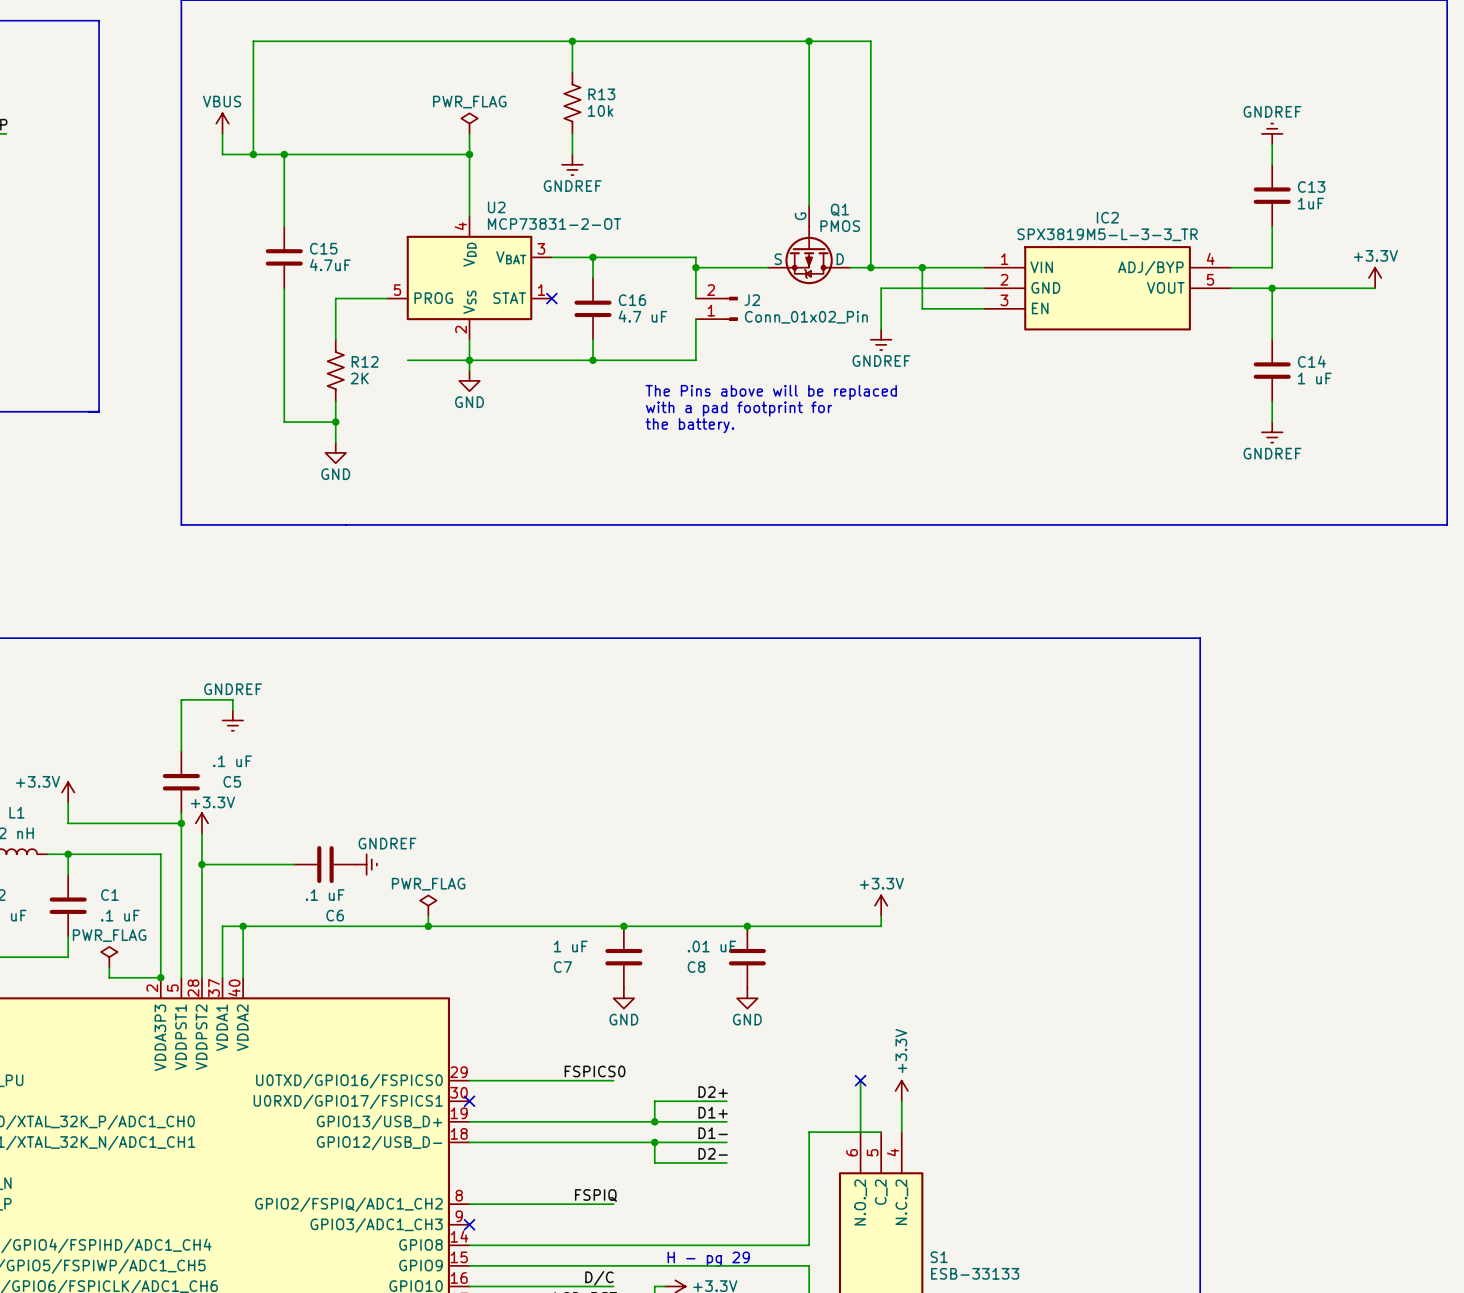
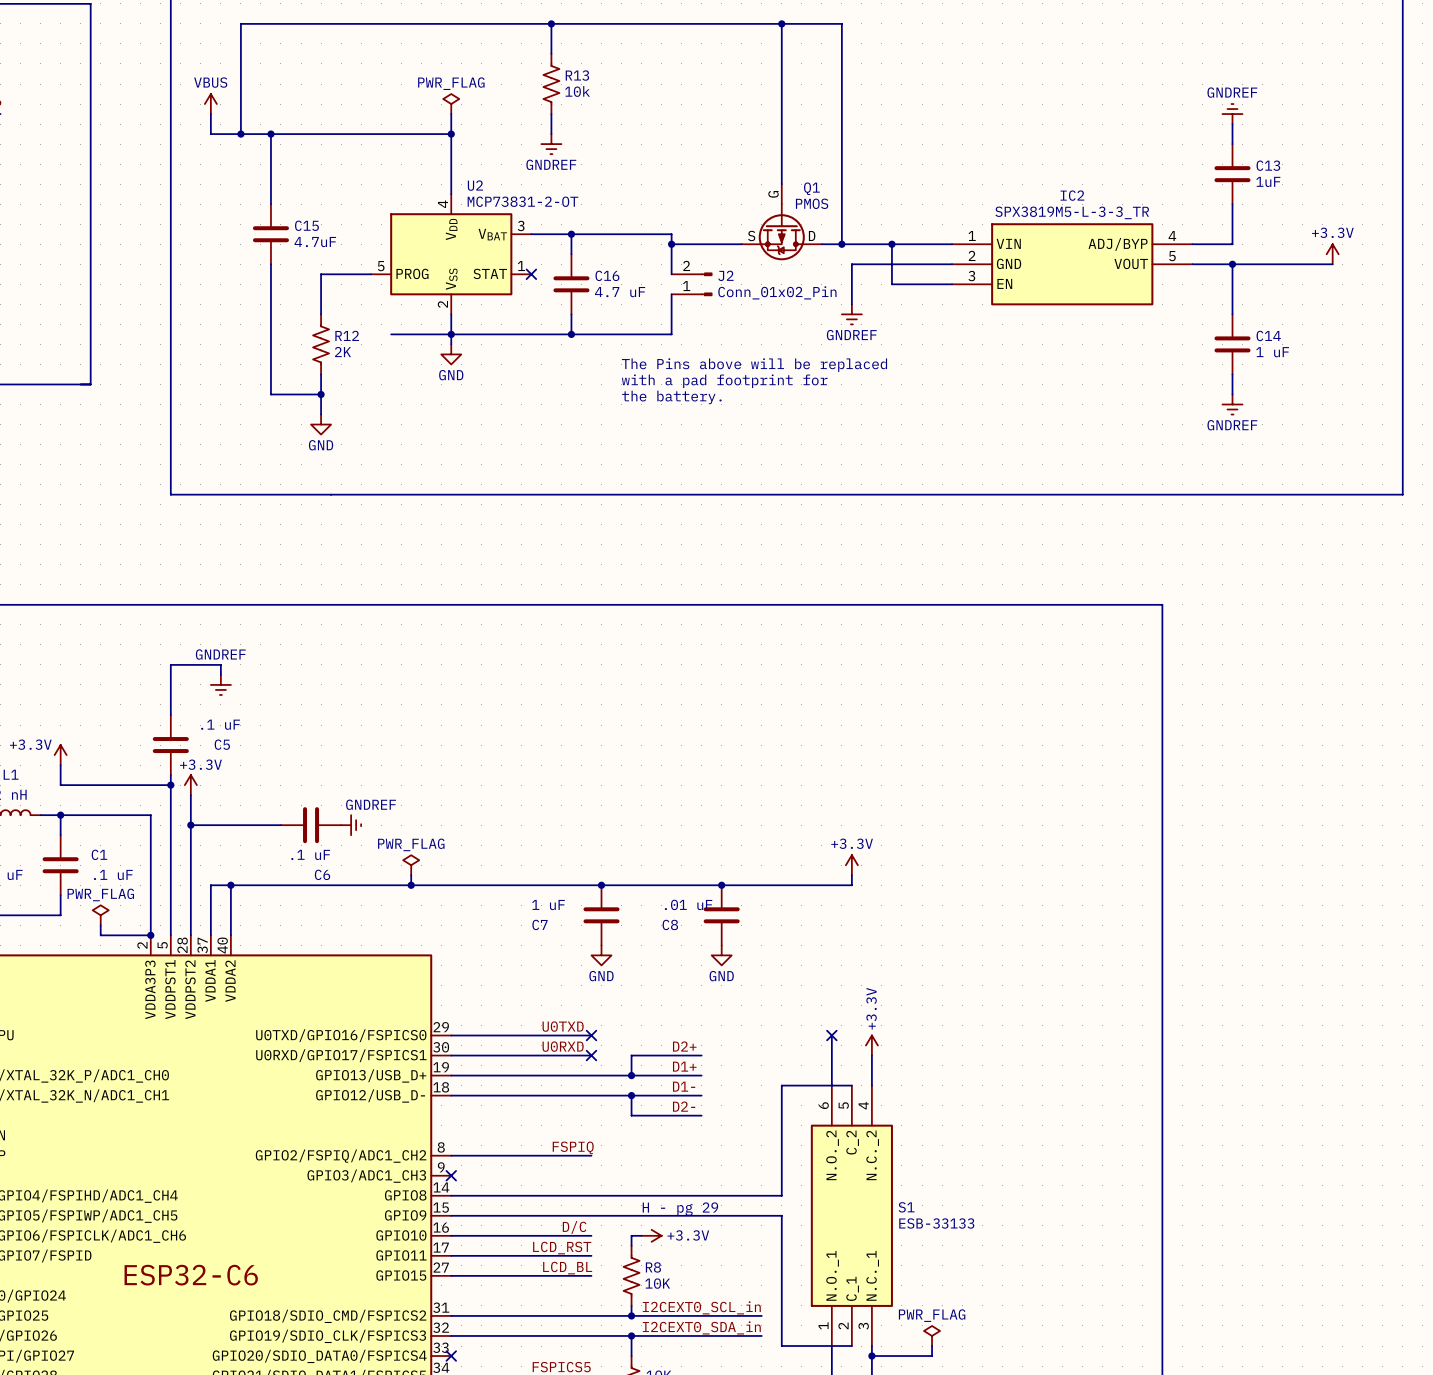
label: FSPICS0 (595, 1071) -> U0TXD (563, 1026)
no-connect mark: none -> (591, 1035)
label: none -> U0RXD (563, 1046)
wire: none -> (451, 1055) (591, 1055)
no-connect mark: (469, 1101) -> none
no-connect mark: none -> (591, 1055)

